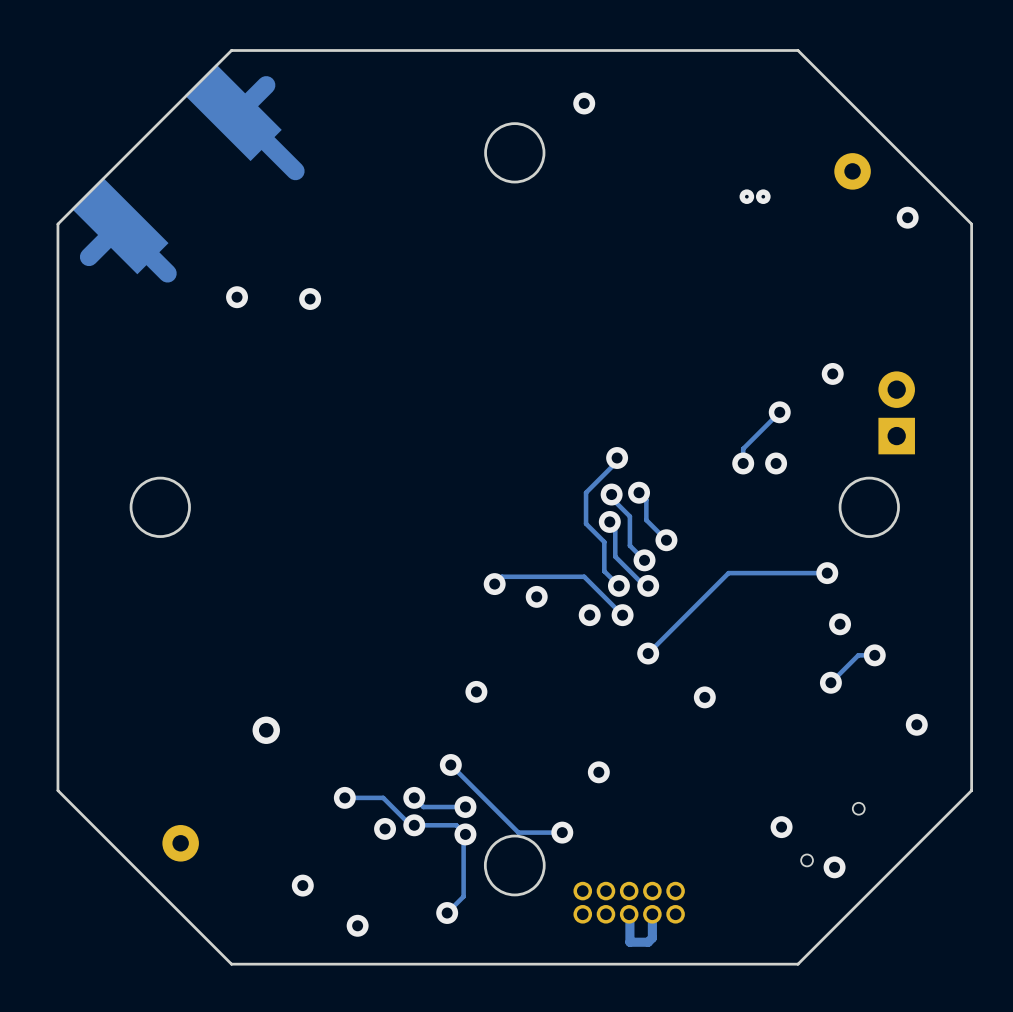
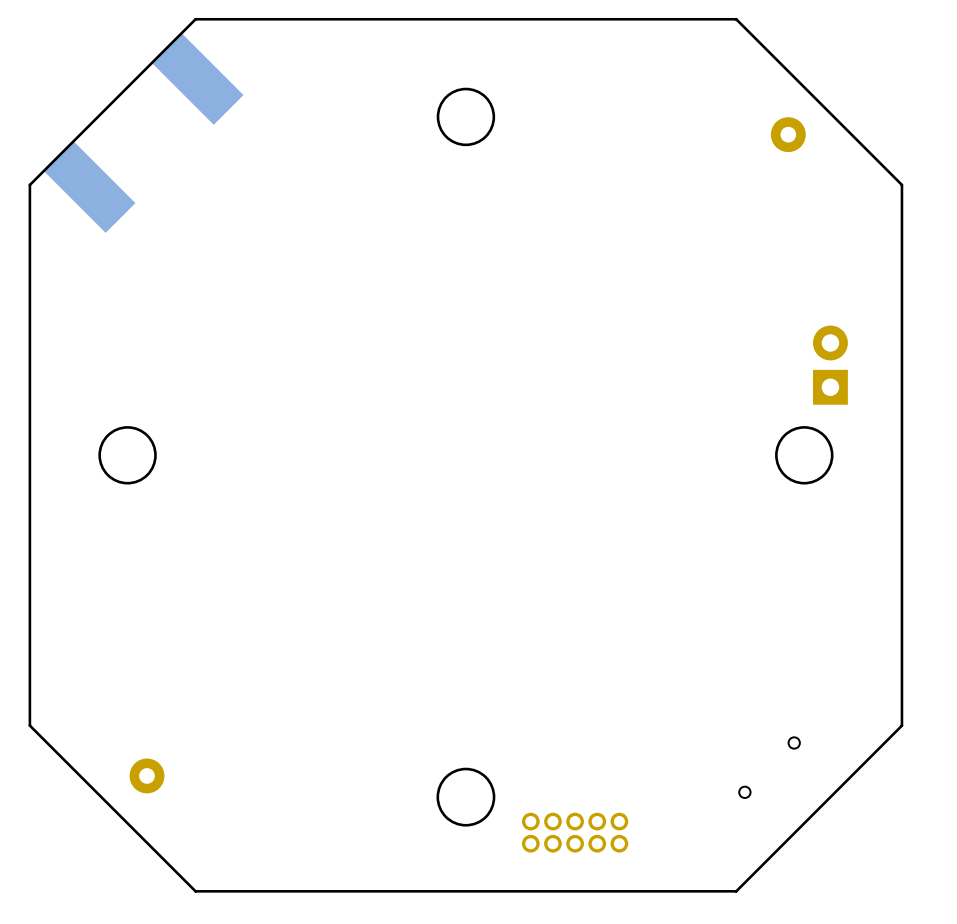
track: (266, 85) (238, 112) (233, 112) -> none
via: (584, 103) -> none
track: (237, 112) (295, 171) -> none
via: (746, 196) -> none
via: (763, 196) -> none
via: (907, 217) -> none
track: (89, 256) (120, 225) (167, 273) -> none
via: (237, 297) -> none
via: (310, 299) -> none
via: (832, 373) -> none
track: (779, 412) (743, 448) (743, 463) -> none
via: (779, 412) -> none
track: (617, 457) (617, 461) (586, 492) (586, 523) (604, 542) (604, 571) (618, 585) -> none
via: (617, 457) -> none
via: (743, 463) -> none
via: (776, 463) -> none
track: (639, 492) (646, 500) (646, 520) (666, 540) -> none
via: (639, 492) -> none
track: (611, 494) (611, 498) (629, 516) (629, 545) (644, 560) -> none
via: (611, 494) -> none
track: (609, 521) (615, 527) (615, 556) (644, 585) (648, 585) -> none
via: (609, 521) -> none
via: (666, 540) -> none
via: (644, 560) -> none
track: (827, 573) (728, 573) (648, 653) -> none
via: (827, 573) -> none
track: (494, 584) (501, 576) (584, 576) (622, 615) -> none
via: (494, 584) -> none
via: (618, 585) -> none
via: (648, 585) -> none
via: (536, 596) -> none
via: (589, 615) -> none
via: (622, 615) -> none
via: (840, 624) -> none
via: (648, 653) -> none
track: (874, 655) (858, 655) (830, 682) -> none
via: (874, 655) -> none
via: (830, 682) -> none
via: (476, 691) -> none
via: (704, 697) -> none
via: (916, 724) -> none
via: (266, 730) -> none
track: (450, 764) (518, 832) (562, 832) -> none
via: (450, 764) -> none
via: (598, 772) -> none
track: (344, 797) (383, 797) (410, 825) (456, 825) (465, 834) -> none
via: (344, 797) -> none
track: (414, 797) (423, 807) (465, 807) -> none
via: (414, 797) -> none
via: (465, 807) -> none
via: (414, 825) -> none
via: (781, 827) -> none
via: (385, 828) -> none
track: (463, 832) (463, 896) (447, 913) -> none
via: (562, 832) -> none
via: (465, 834) -> none
via: (834, 867) -> none
via: (302, 885) -> none
via: (447, 913) -> none
track: (652, 914) (652, 938) (648, 942) (629, 942) (629, 914) -> none
via: (357, 925) -> none

